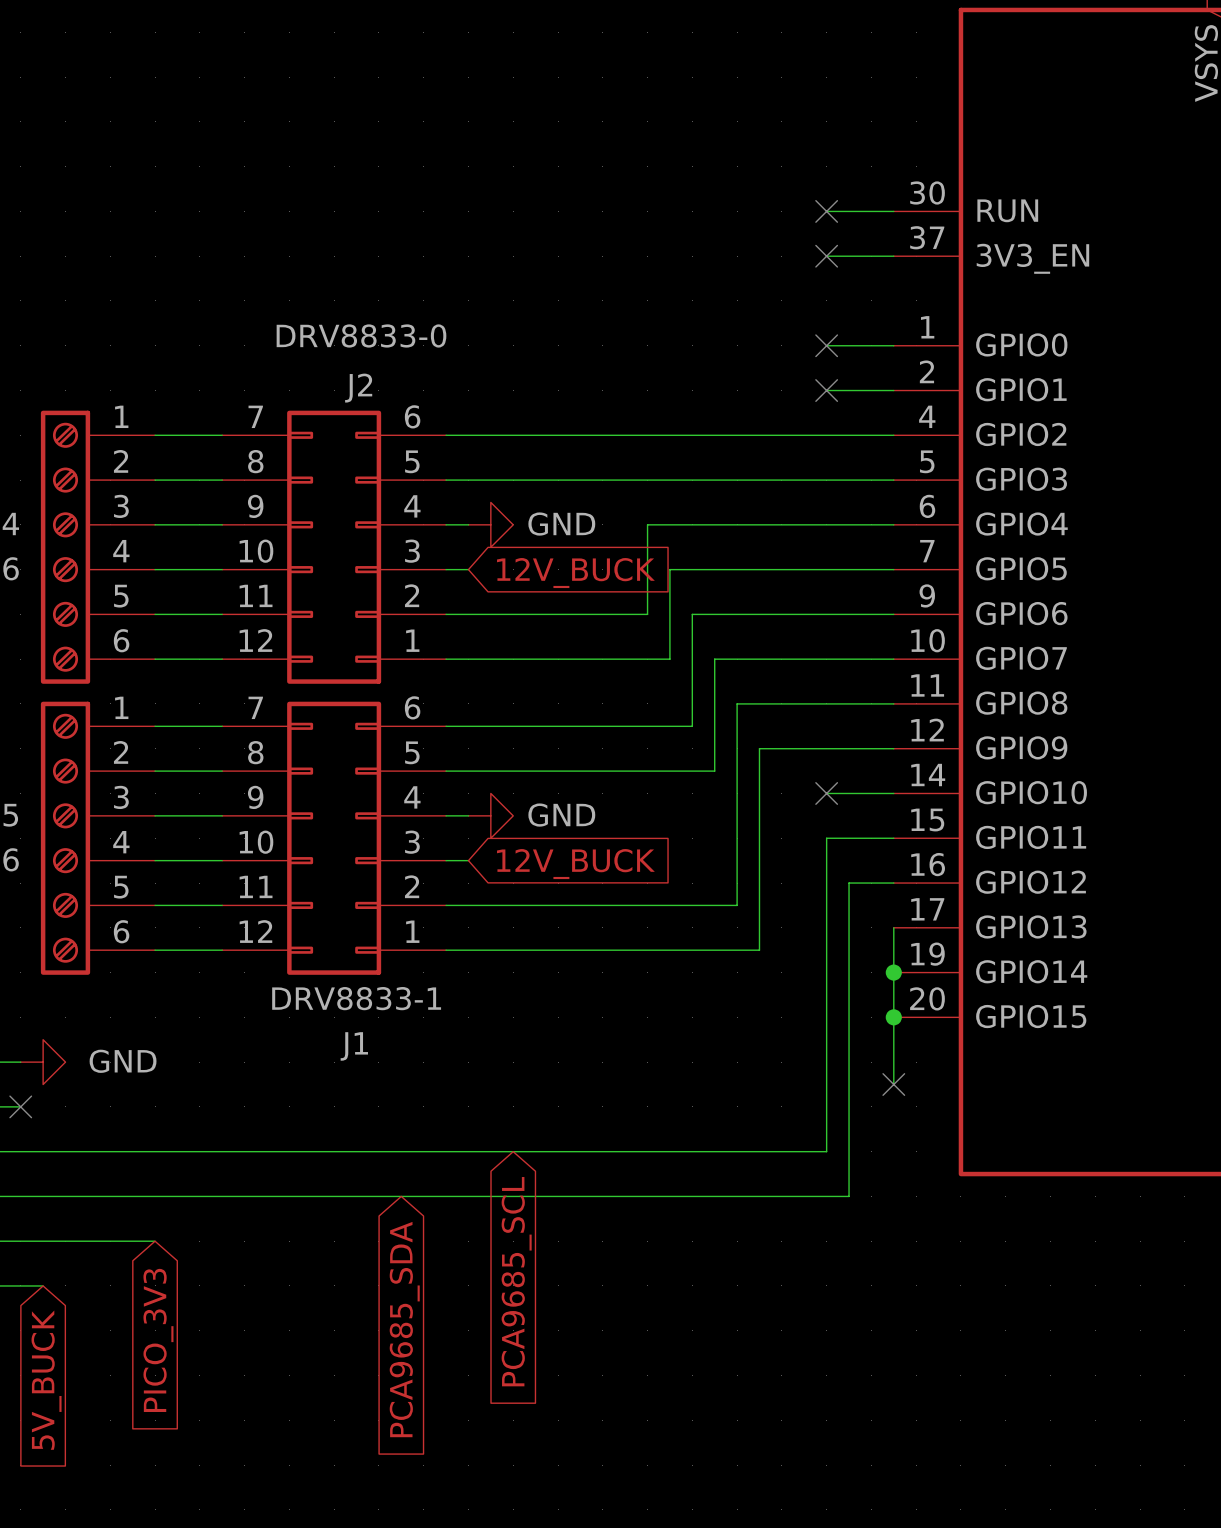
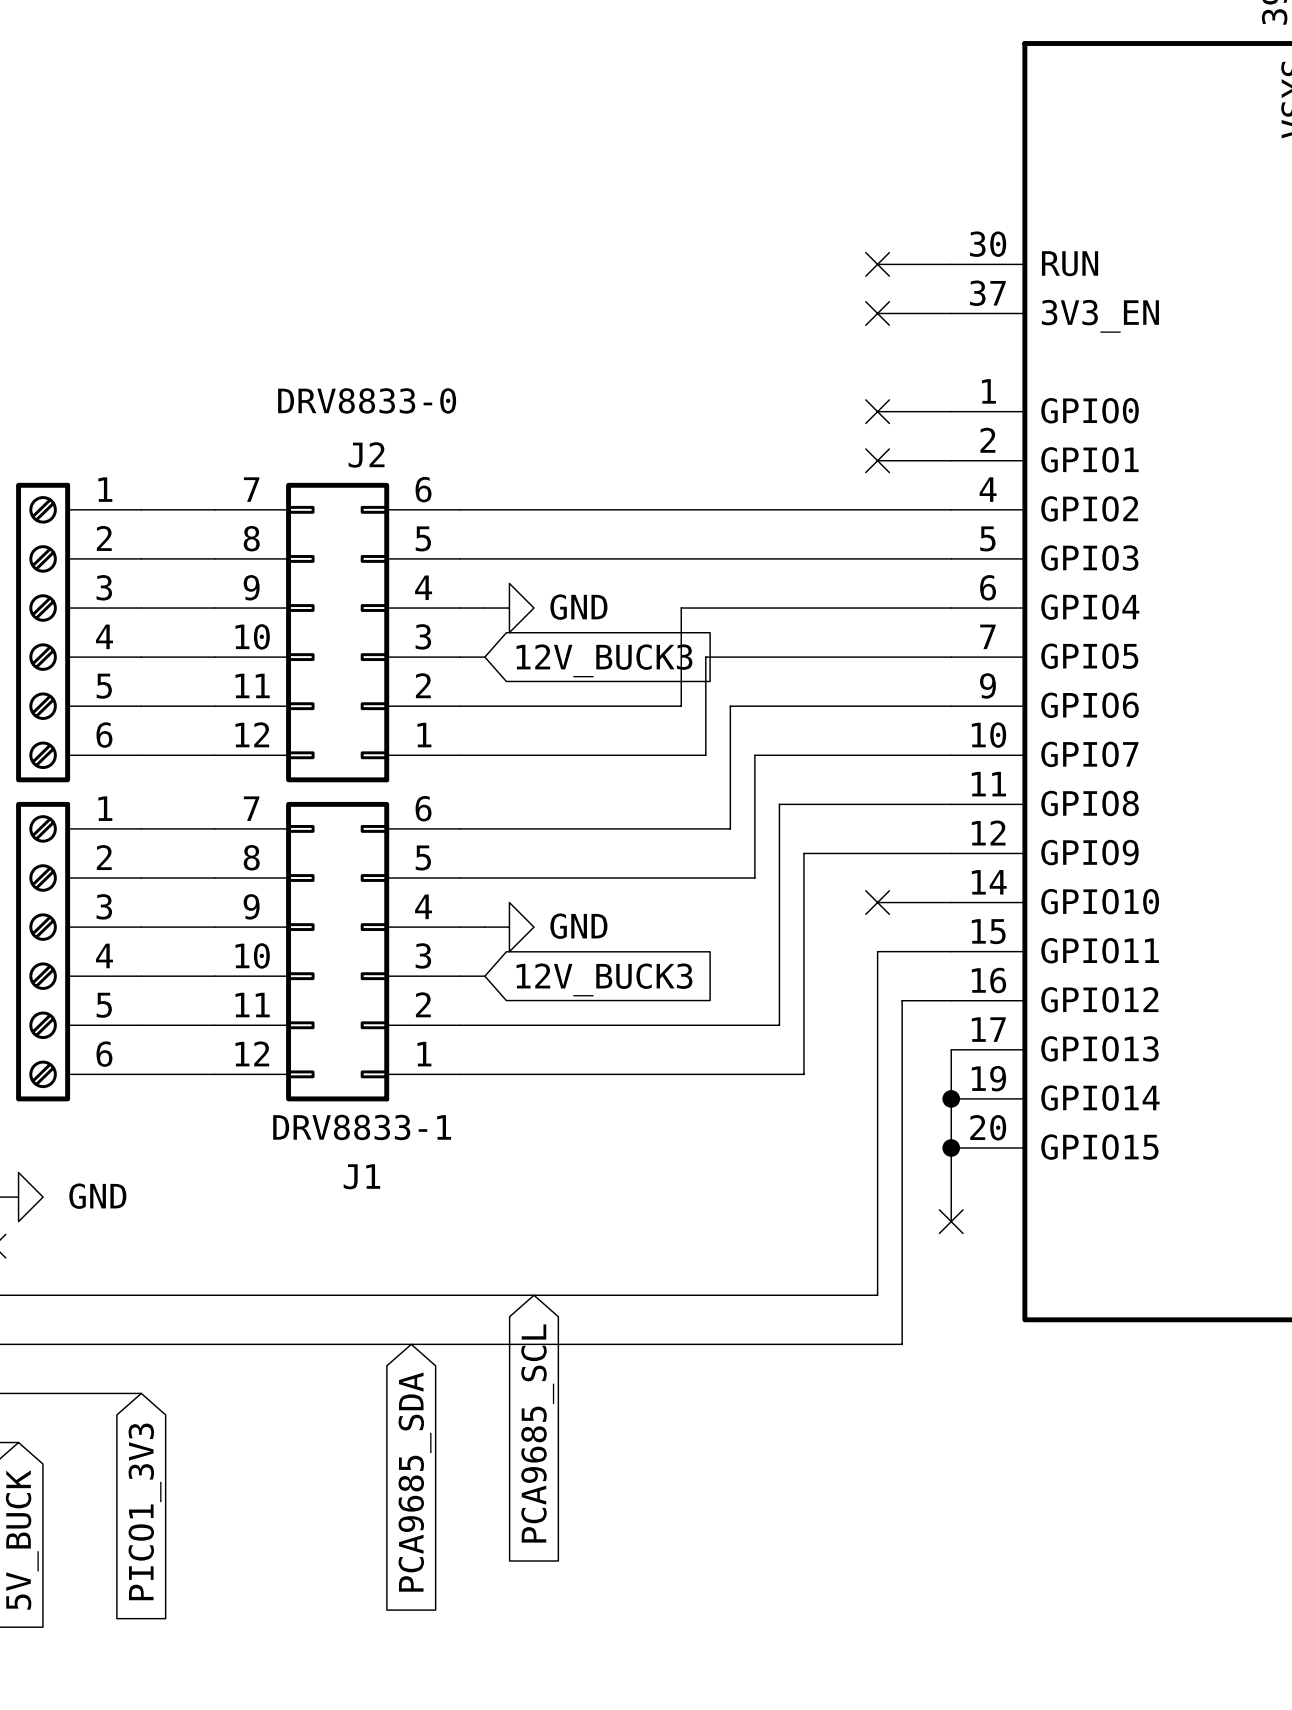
global label: 12V_BUCK (575, 573) -> 12V_BUCK3 (604, 660)
global label: 12V_BUCK (575, 864) -> 12V_BUCK3 (604, 979)
global label: PICO_3V3 (158, 1340) -> PICO1_3V3 (145, 1511)

